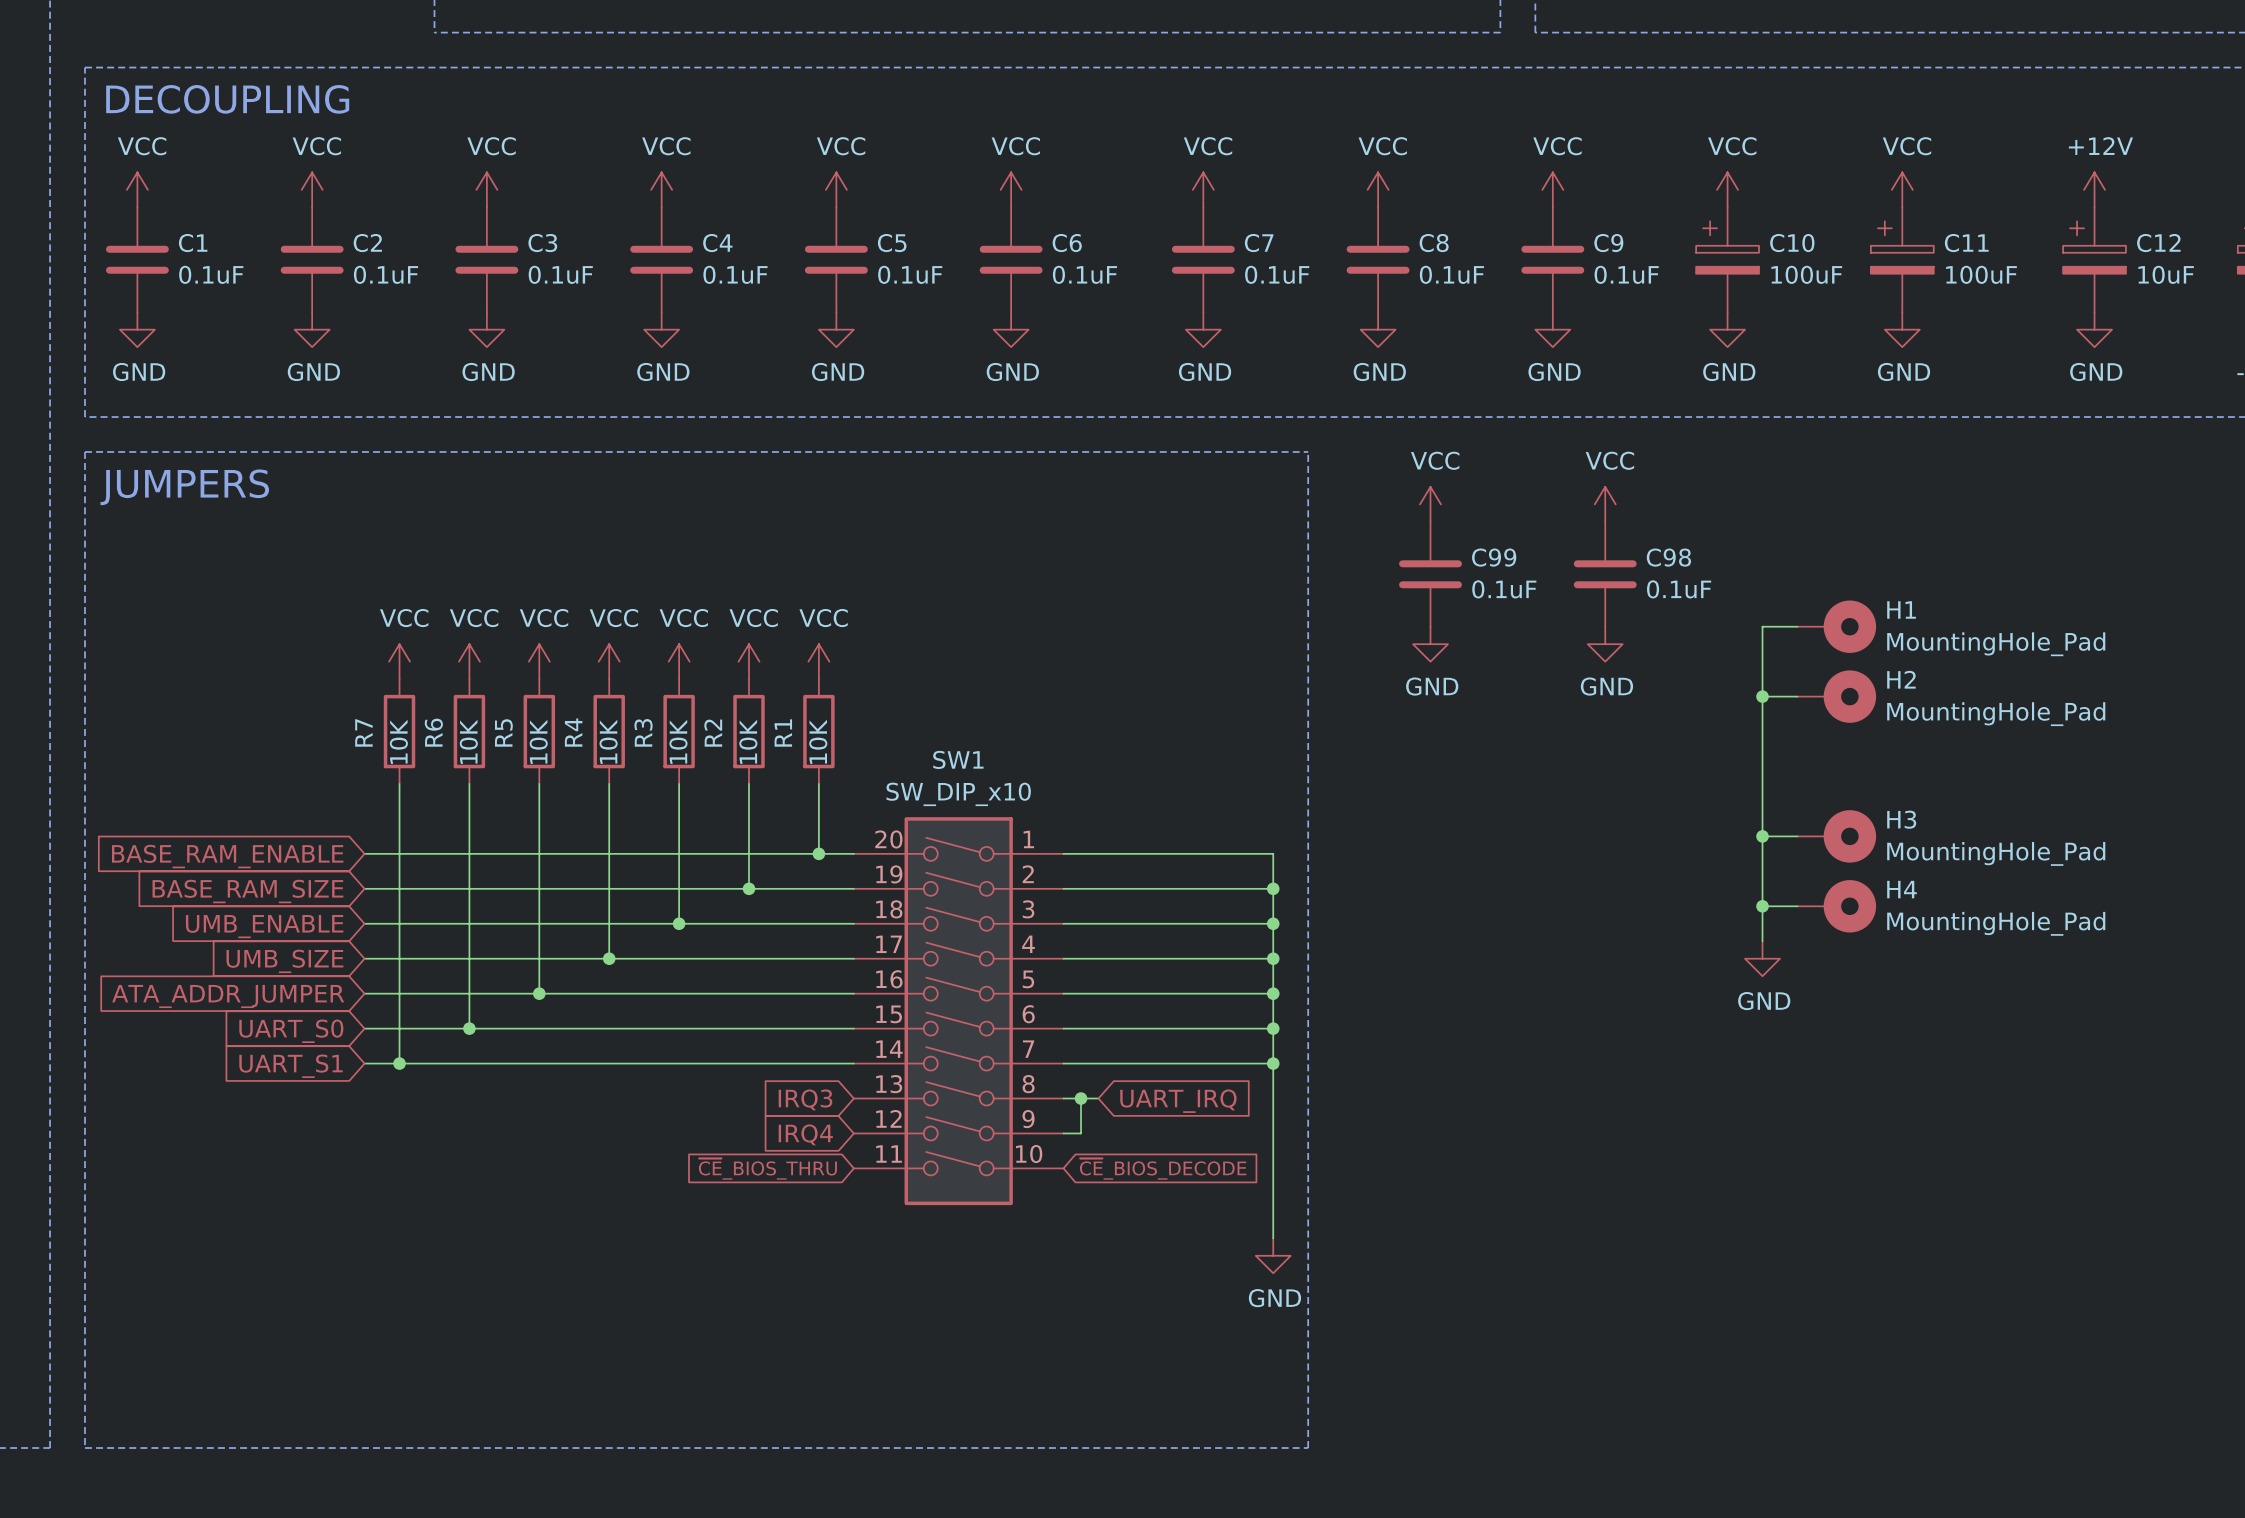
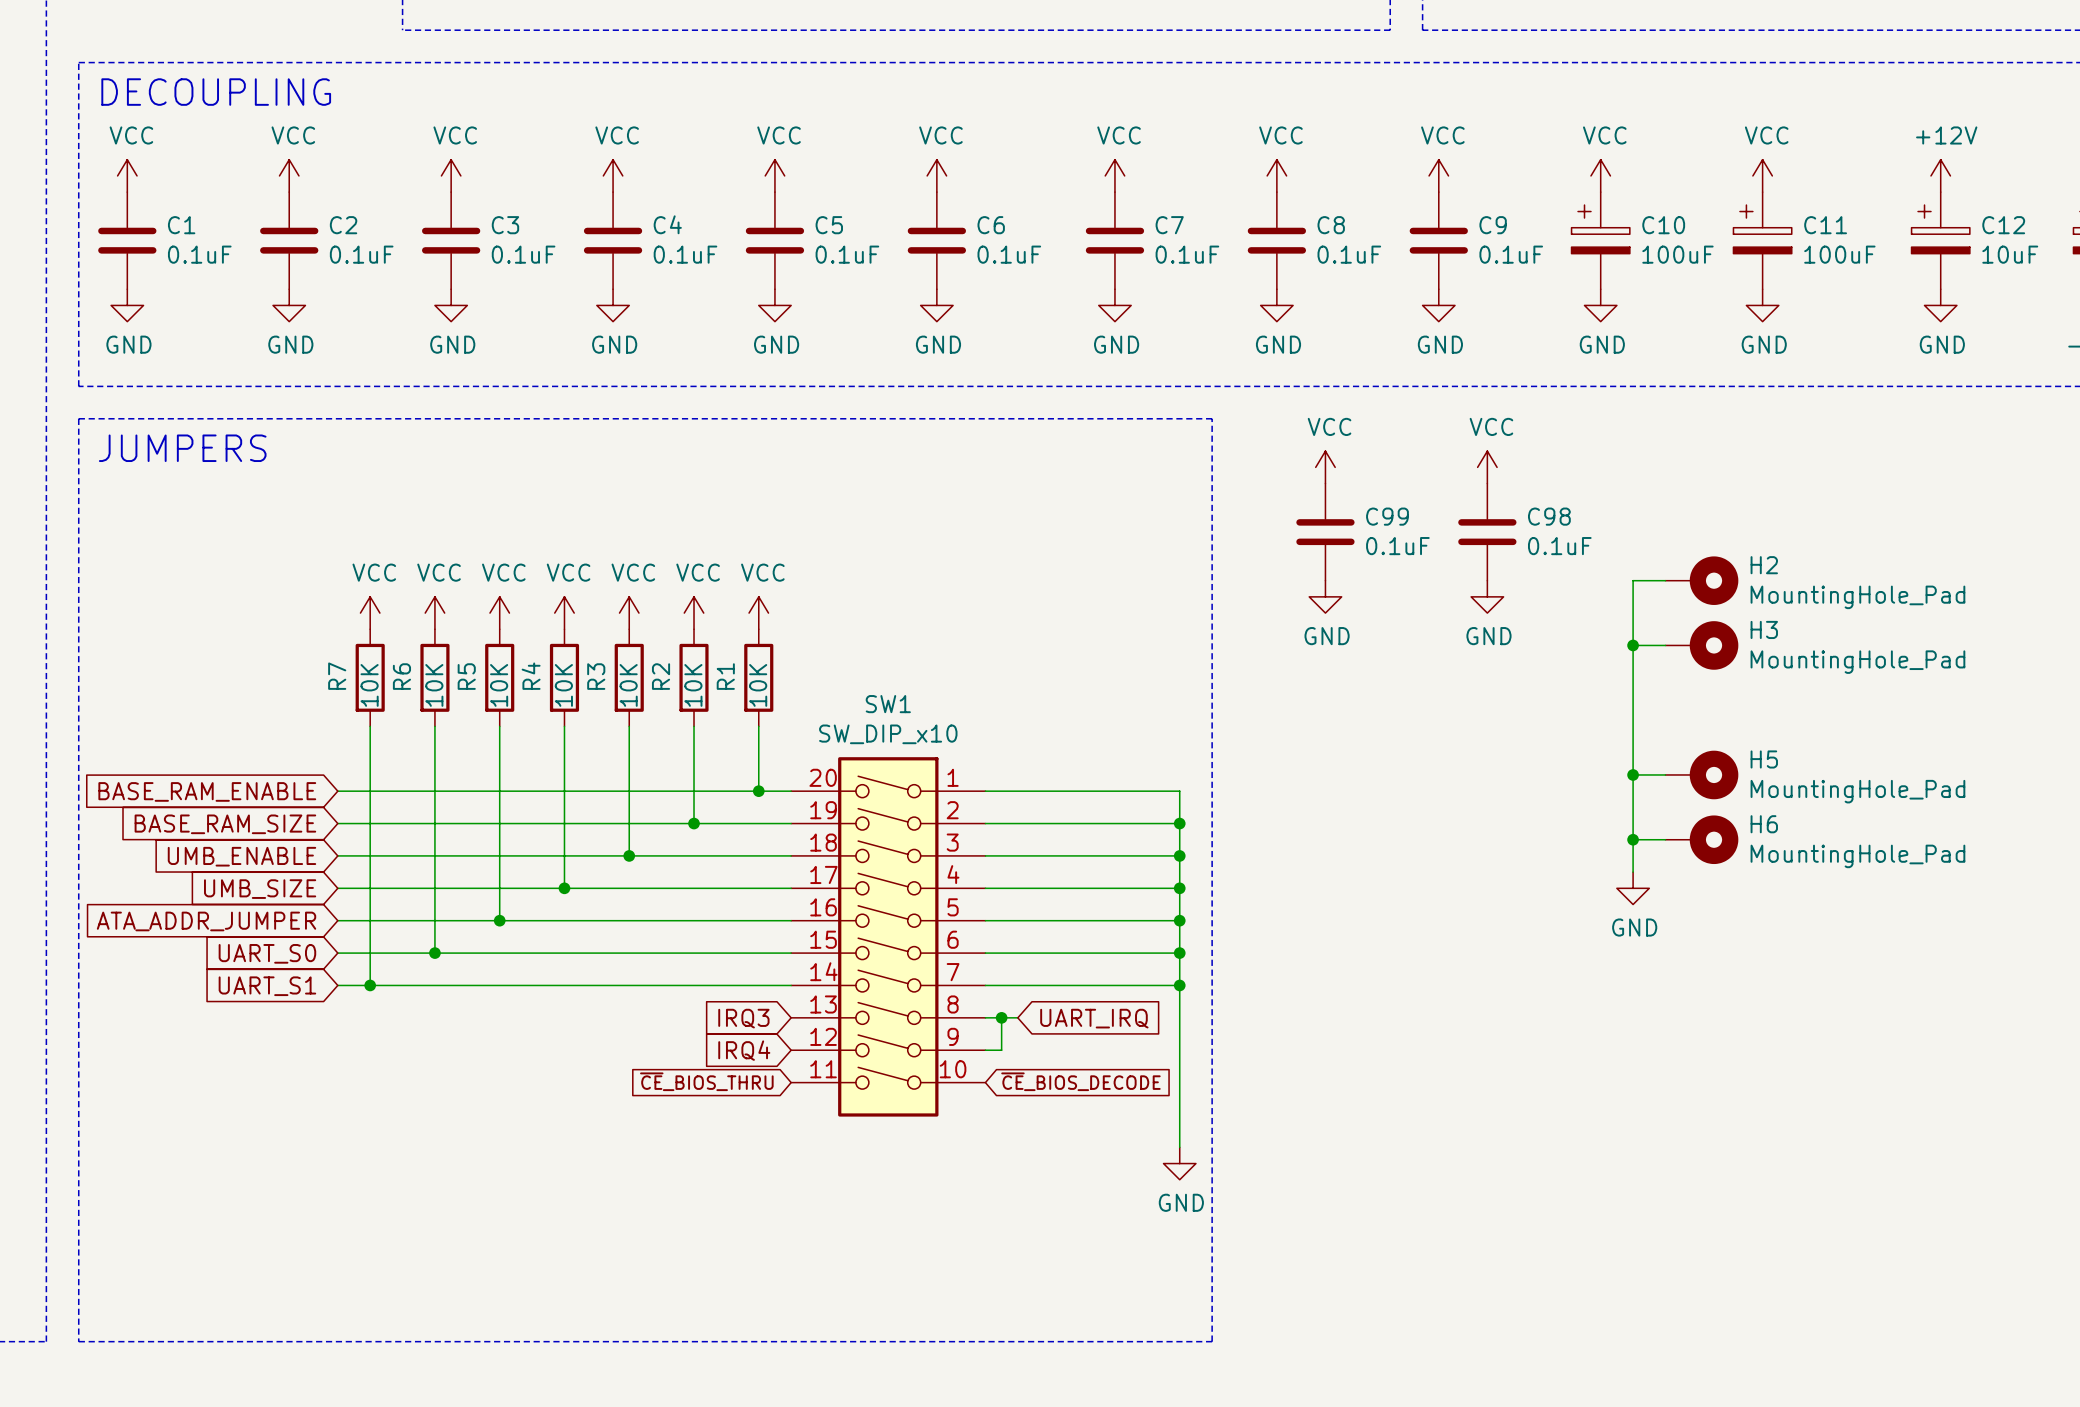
H1 name: H1 (1901, 609) -> H2 (1764, 565)
H2 name: H2 (1901, 679) -> H3 (1764, 629)
H3 name: H3 (1901, 819) -> H5 (1764, 759)
H4 name: H4 (1901, 889) -> H6 (1764, 824)

